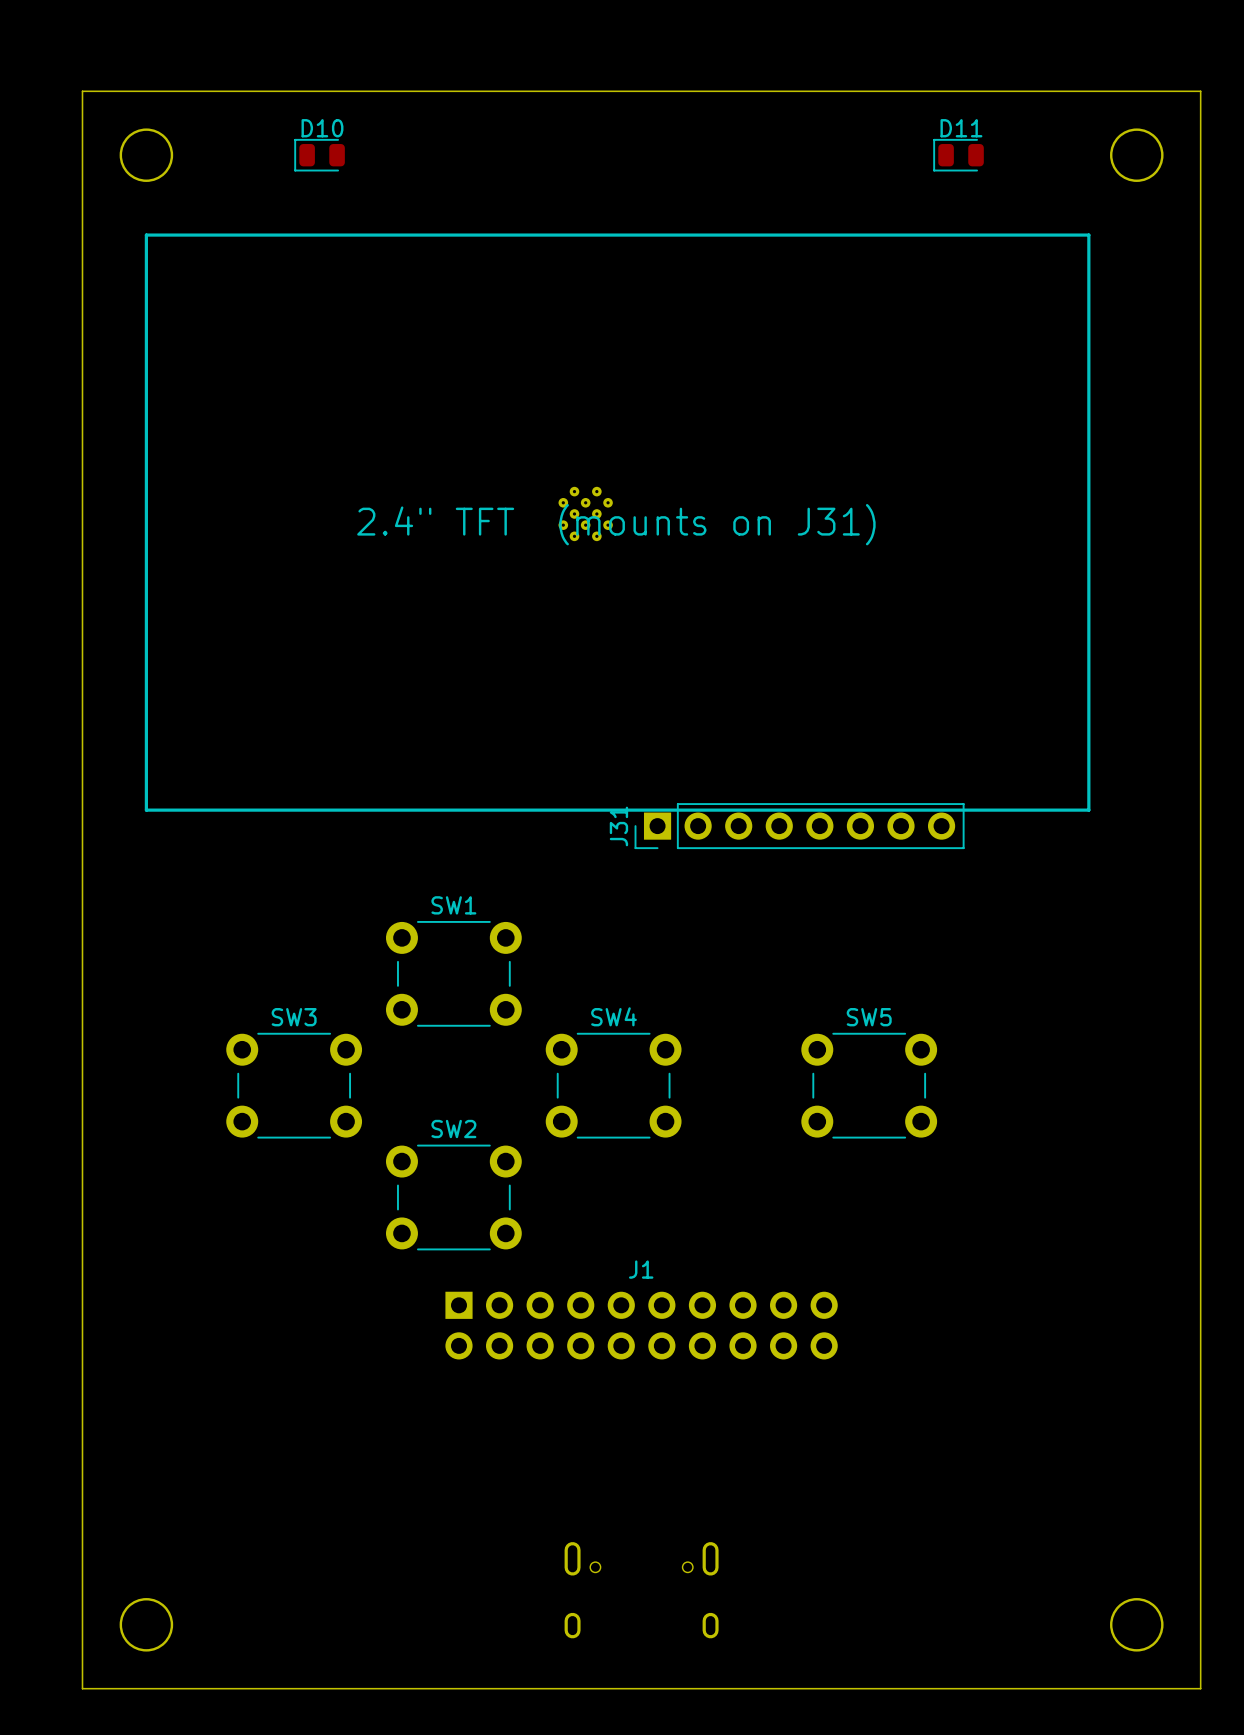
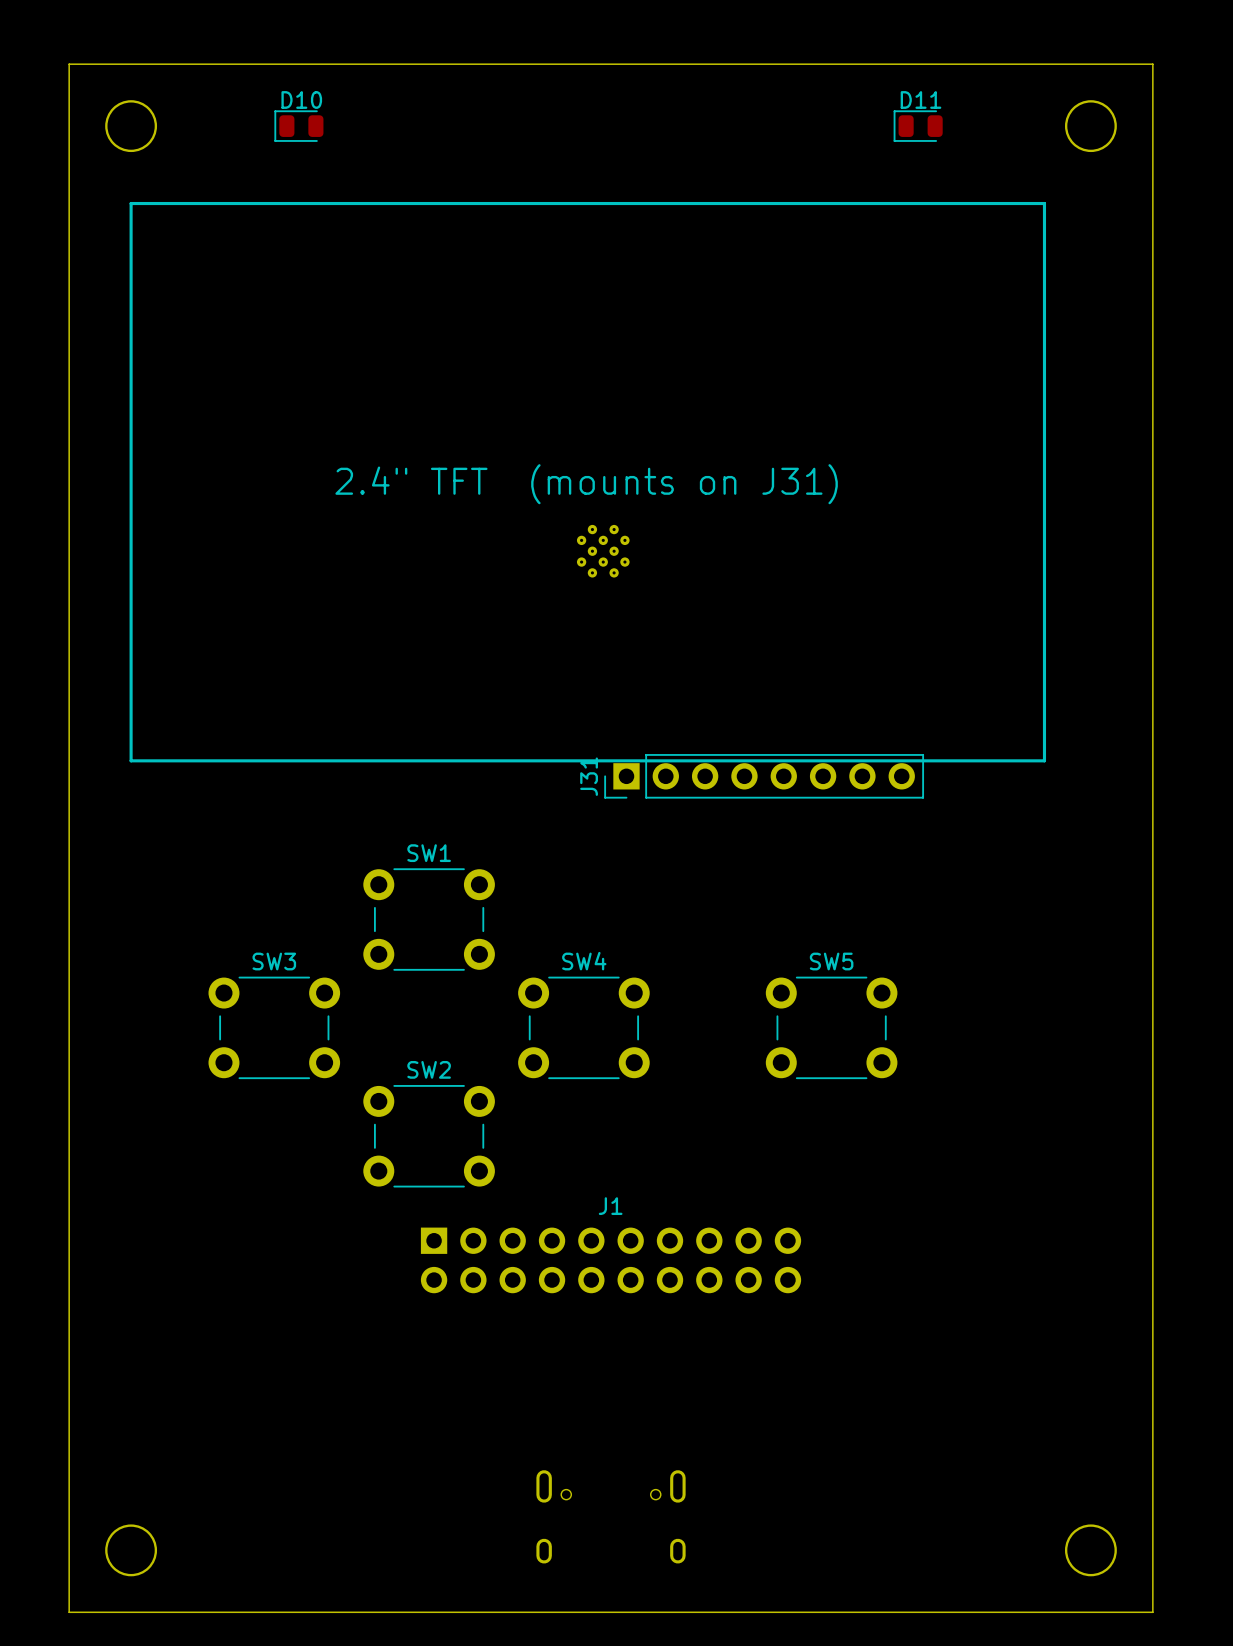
part position: (585, 513) -> (603, 551)

